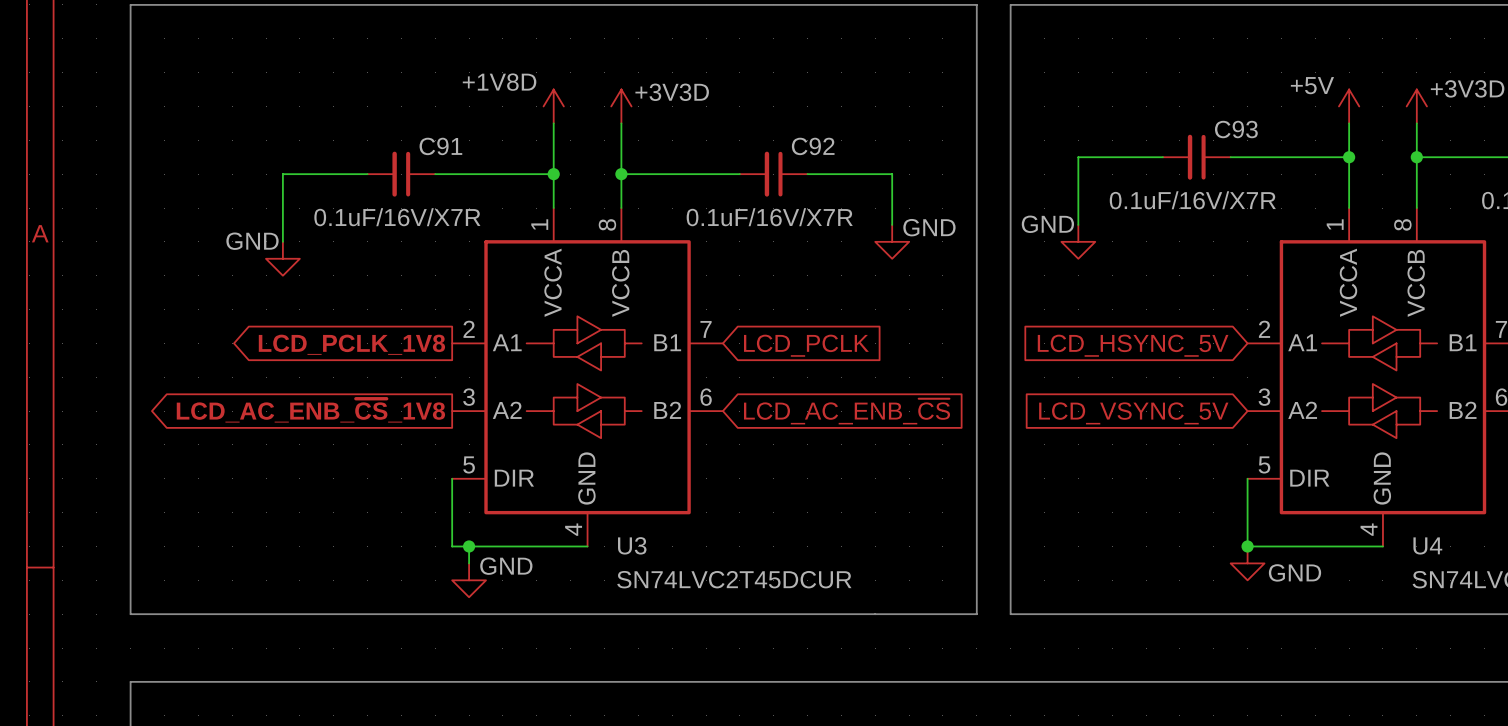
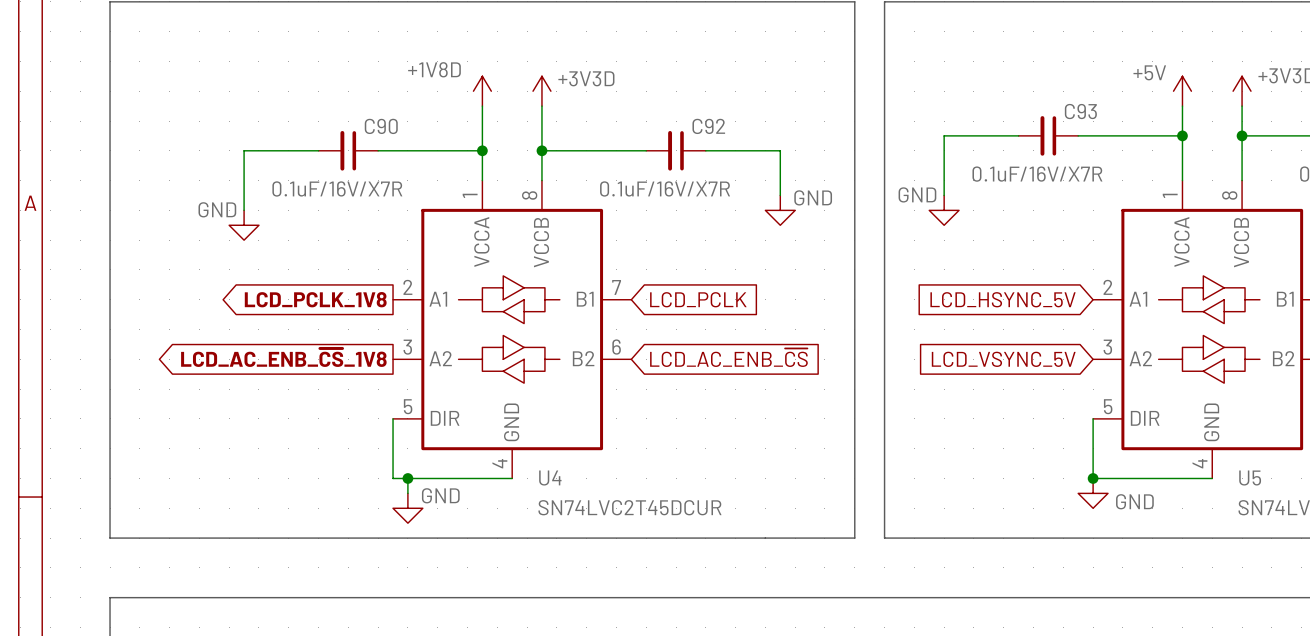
C91 name: C91 (440, 146) -> C90 (381, 126)
U3 name: U3 (632, 545) -> U4 (550, 478)
U4 name: U4 (1427, 545) -> U5 (1250, 478)

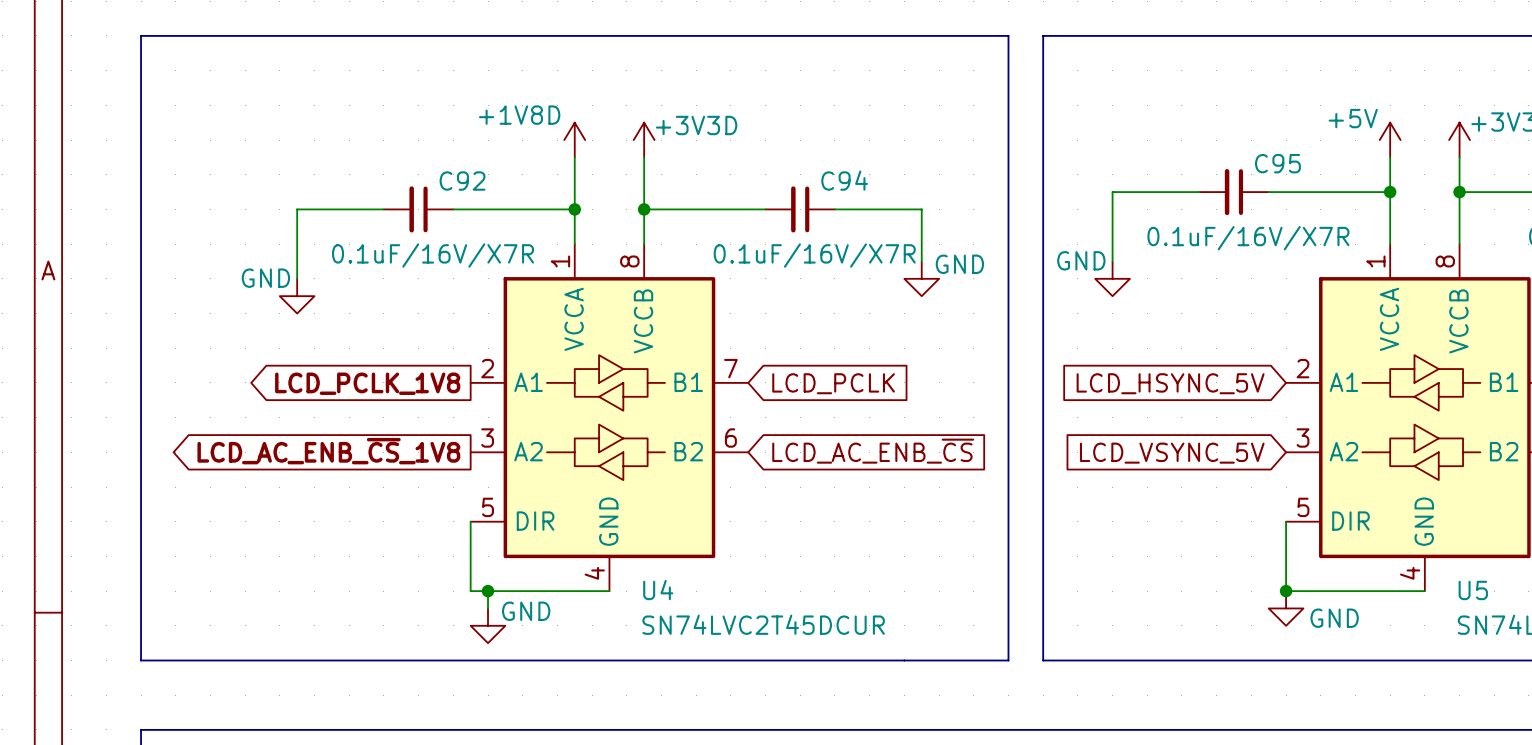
C93 name: C93 (1080, 111) -> C95 (1277, 163)
C90 name: C90 (381, 126) -> C92 (462, 181)
C92 name: C92 (708, 126) -> C94 (844, 180)

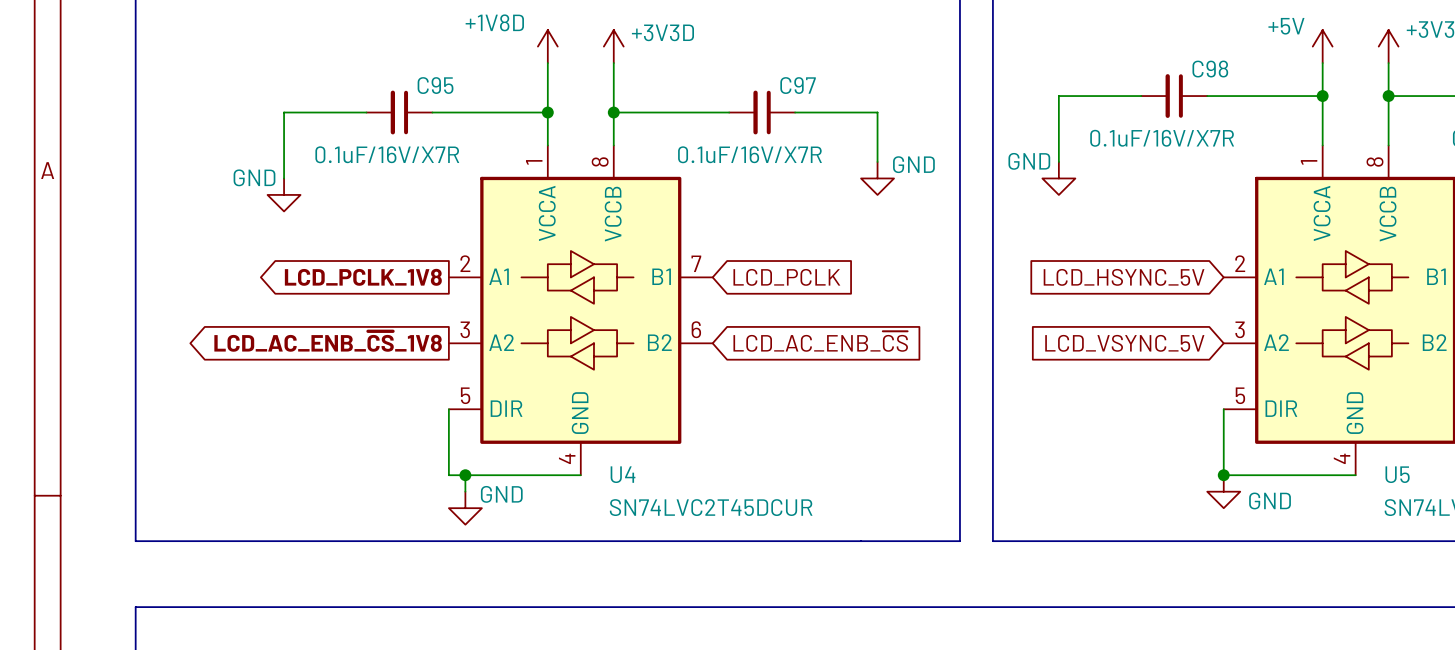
C95 name: C95 (1277, 163) -> C98 (1210, 69)
C94 name: C94 (844, 180) -> C97 (798, 85)
C92 name: C92 (462, 181) -> C95 (435, 85)

